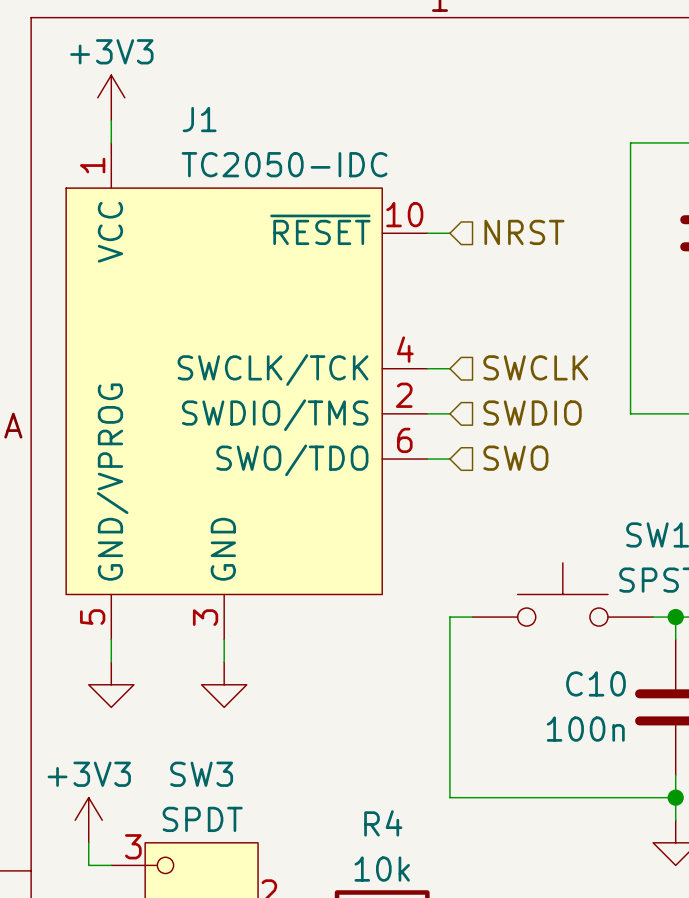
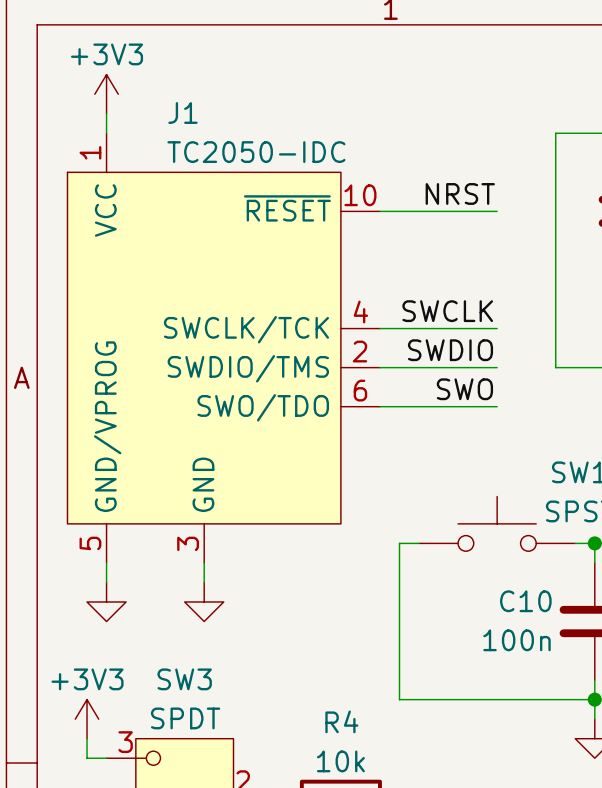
label: none -> NRST (460, 193)
hierarchical label: NRST (524, 232) -> none
wire: none -> (399, 211) (497, 211)
label: none -> SWCLK (447, 311)
hierarchical label: SWCLK (535, 367) -> none
wire: none -> (399, 328) (497, 328)
label: none -> SWDIO (450, 350)
wire: none -> (399, 367) (497, 367)
hierarchical label: SWDIO (532, 413) -> none
label: none -> SWO (464, 389)
hierarchical label: SWO (515, 458) -> none
wire: none -> (399, 406) (497, 406)

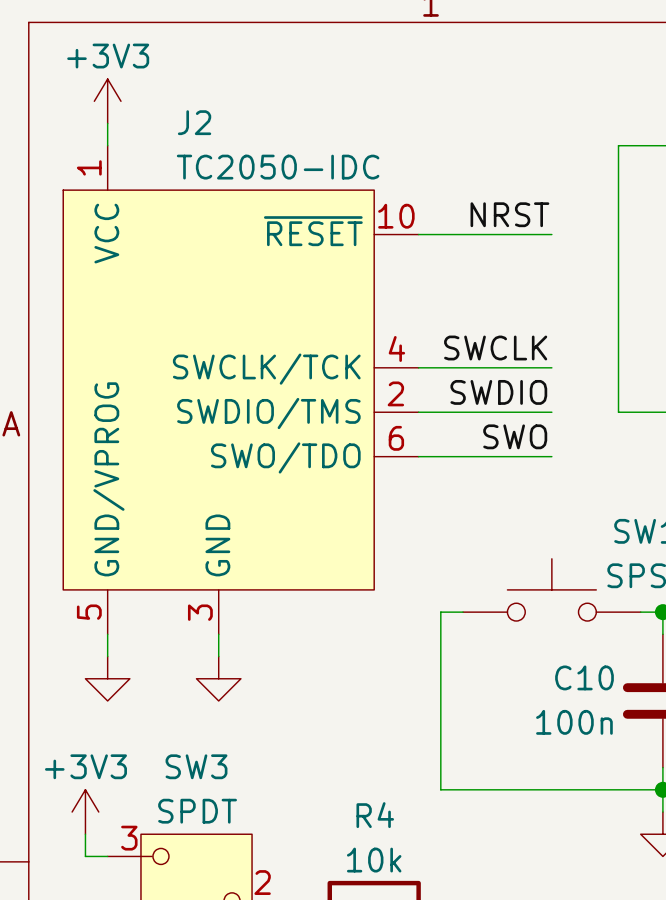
J1 name: J1 (182, 113) -> J2 (194, 122)

